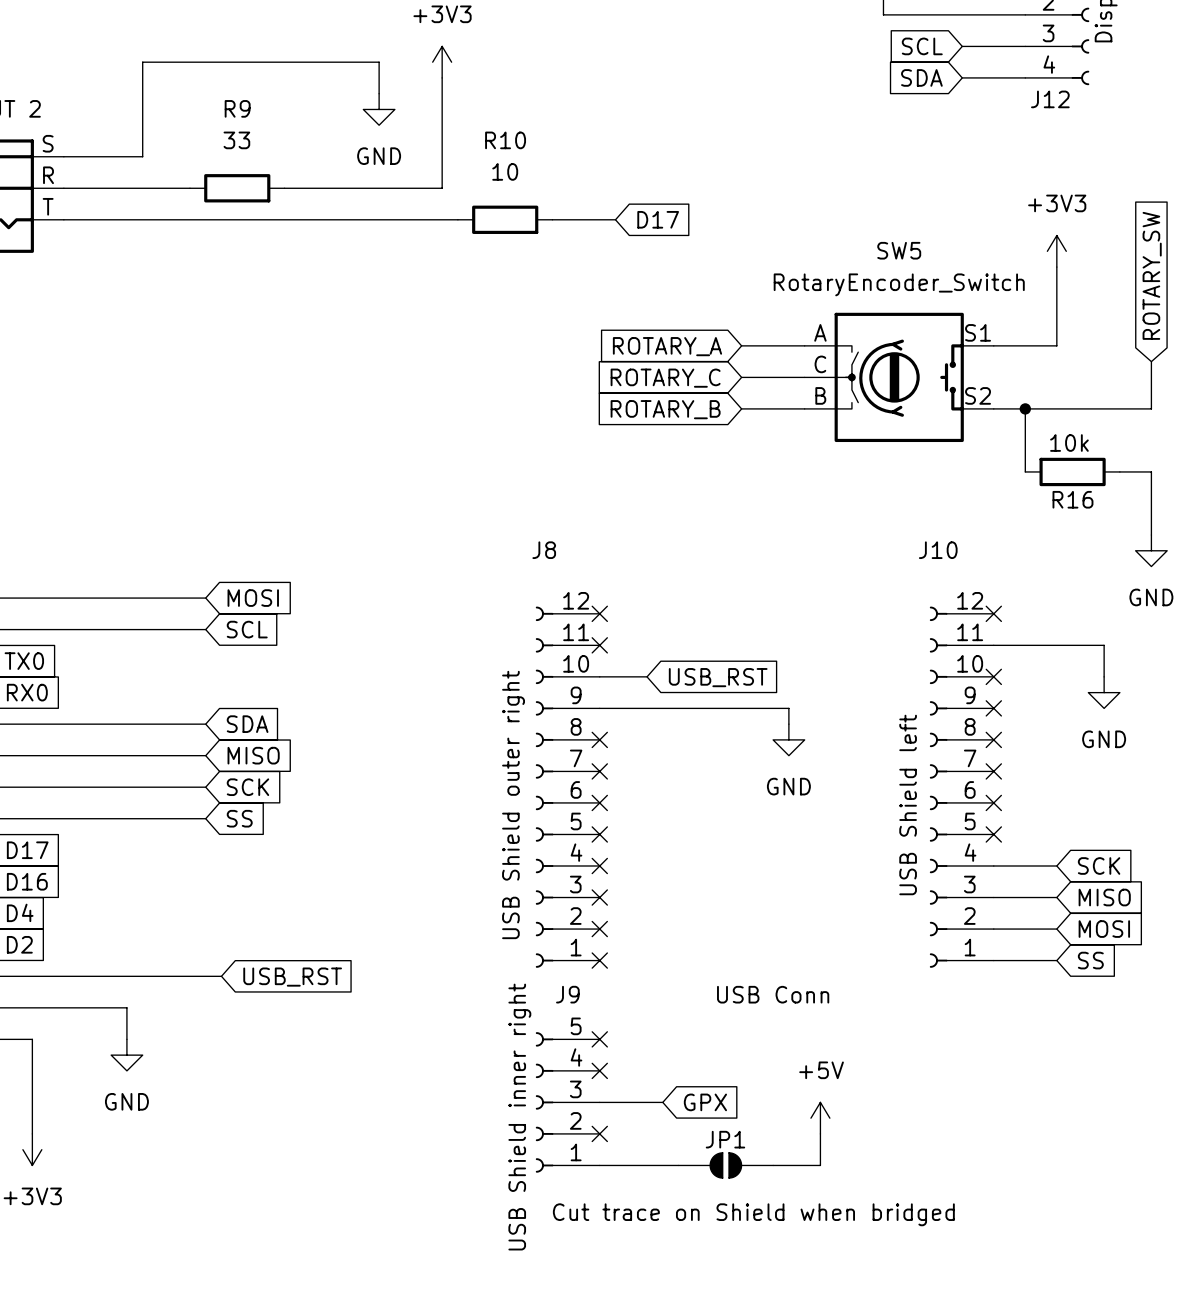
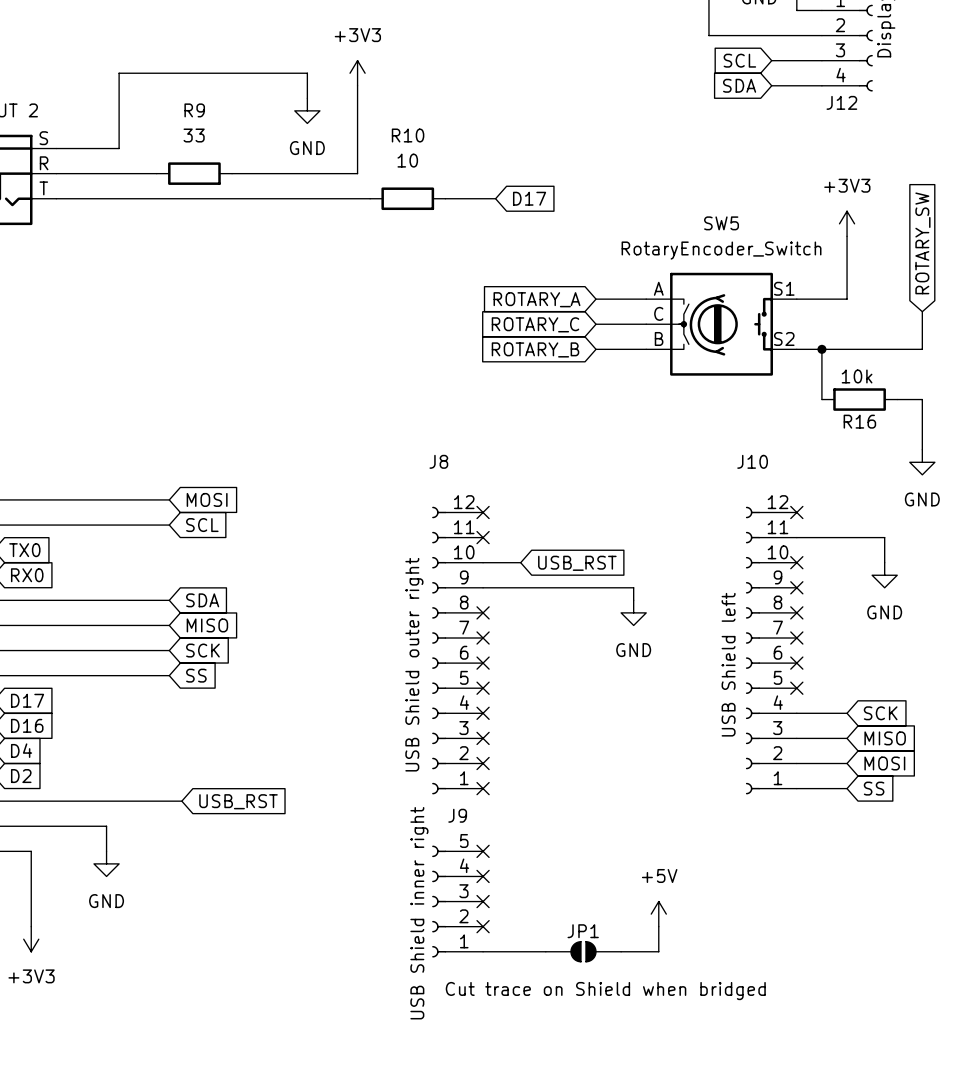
text: USB Conn (773, 994) -> none
wire: (599, 1102) (662, 1102) -> none
no-connect mark: none -> (483, 901)
global label: GPX (705, 1102) -> none

